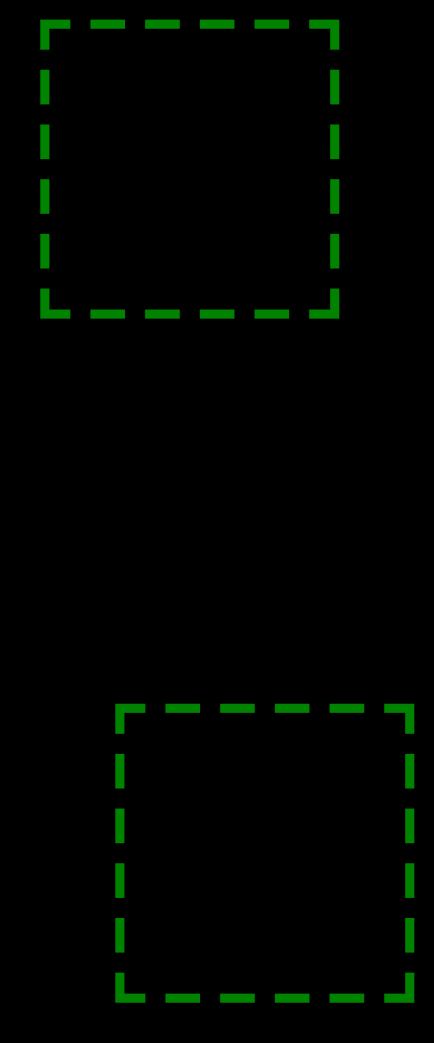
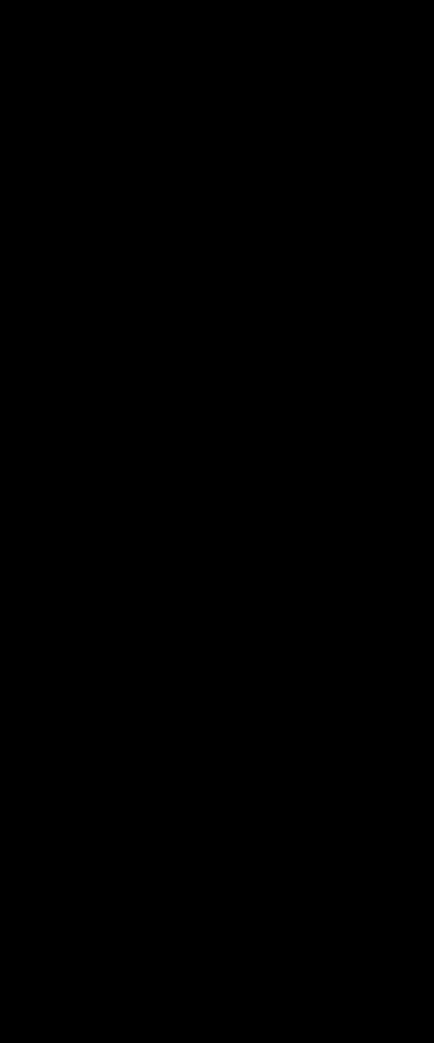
part: (189, 169) -> none
part: (264, 853) -> none

